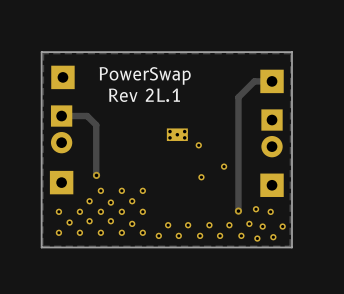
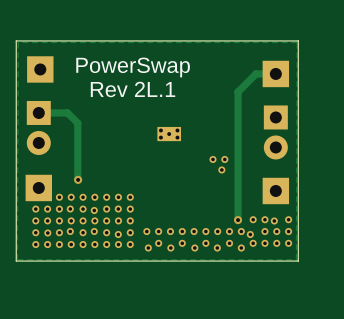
part: (198, 145) -> none
part: none -> (212, 159)
part: none -> (224, 159)
part: (201, 177) -> none
part: none -> (59, 197)
part: none -> (71, 197)
part: none -> (94, 197)
part: none -> (118, 197)
part: none -> (35, 209)
part: none -> (47, 209)
part: none -> (59, 209)
part: none -> (83, 209)
part: none -> (106, 209)
part: none -> (130, 209)
part: (256, 209) -> none
part: none -> (253, 219)
part: none -> (264, 219)
part: none -> (288, 219)
part: none -> (47, 220)
part: none -> (71, 220)
part: none -> (94, 220)
part: none -> (118, 220)
part: none -> (146, 231)
part: none -> (158, 231)
part: none -> (170, 231)
part: none -> (182, 231)
part: none -> (194, 231)
part: none -> (205, 231)
part: none -> (217, 231)
part: none -> (229, 231)
part: none -> (241, 231)
part: none -> (264, 231)
part: none -> (276, 231)
part: none -> (288, 231)
part: none -> (35, 232)
part: none -> (59, 232)
part: none -> (83, 232)
part: none -> (106, 232)
part: none -> (130, 232)
part: (168, 225) -> none
part: (188, 225) -> none
part: (209, 225) -> none
part: (229, 225) -> none
part: (262, 226) -> none
part: (282, 226) -> none
part: none -> (158, 243)
part: none -> (182, 243)
part: none -> (205, 243)
part: none -> (229, 243)
part: none -> (253, 243)
part: none -> (264, 243)
part: none -> (276, 243)
part: none -> (288, 243)
part: none -> (47, 244)
part: none -> (71, 244)
part: none -> (94, 244)
part: none -> (118, 244)
part: (273, 237) -> none
part: (257, 238) -> none

